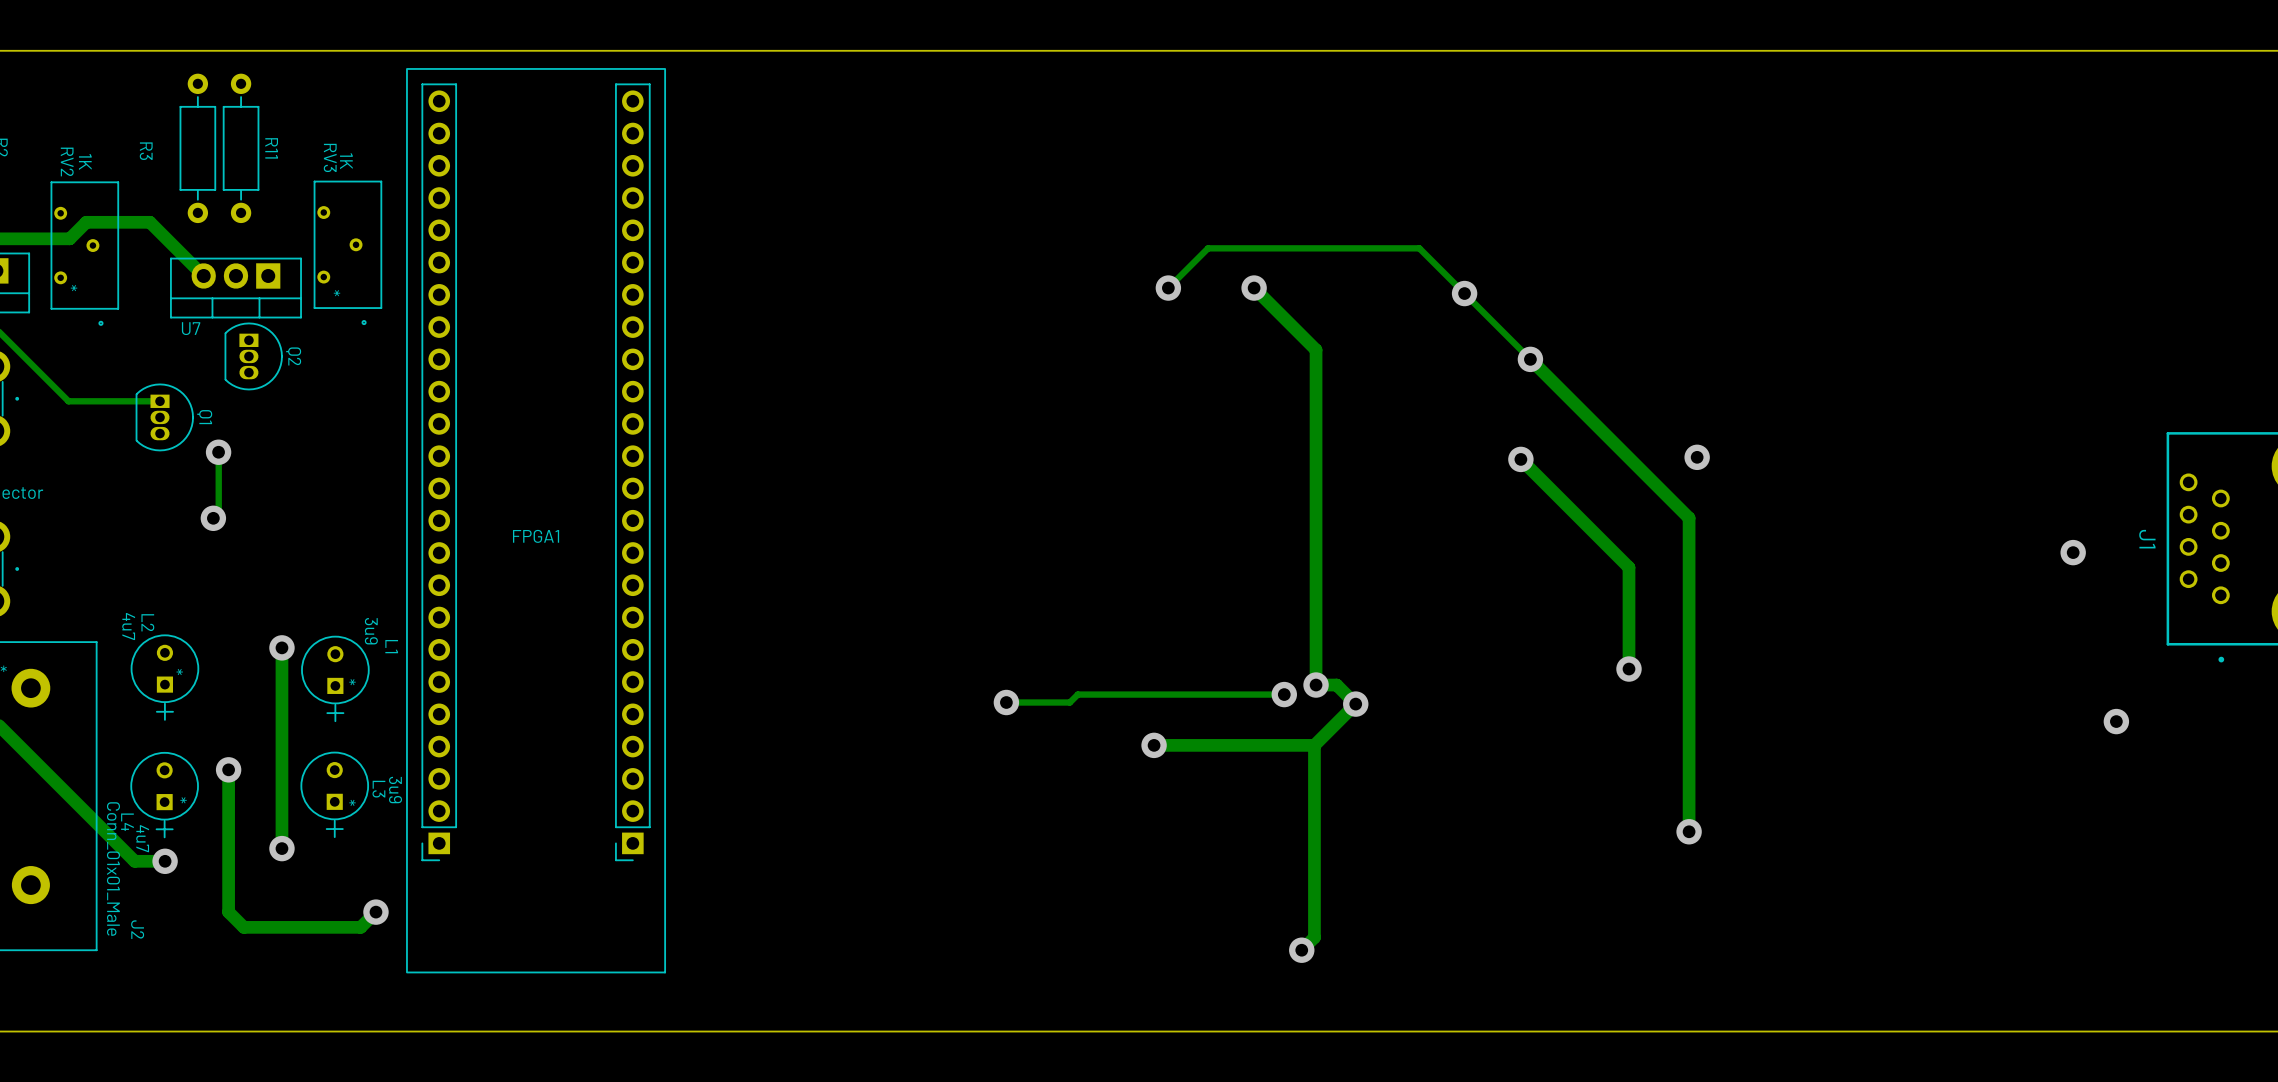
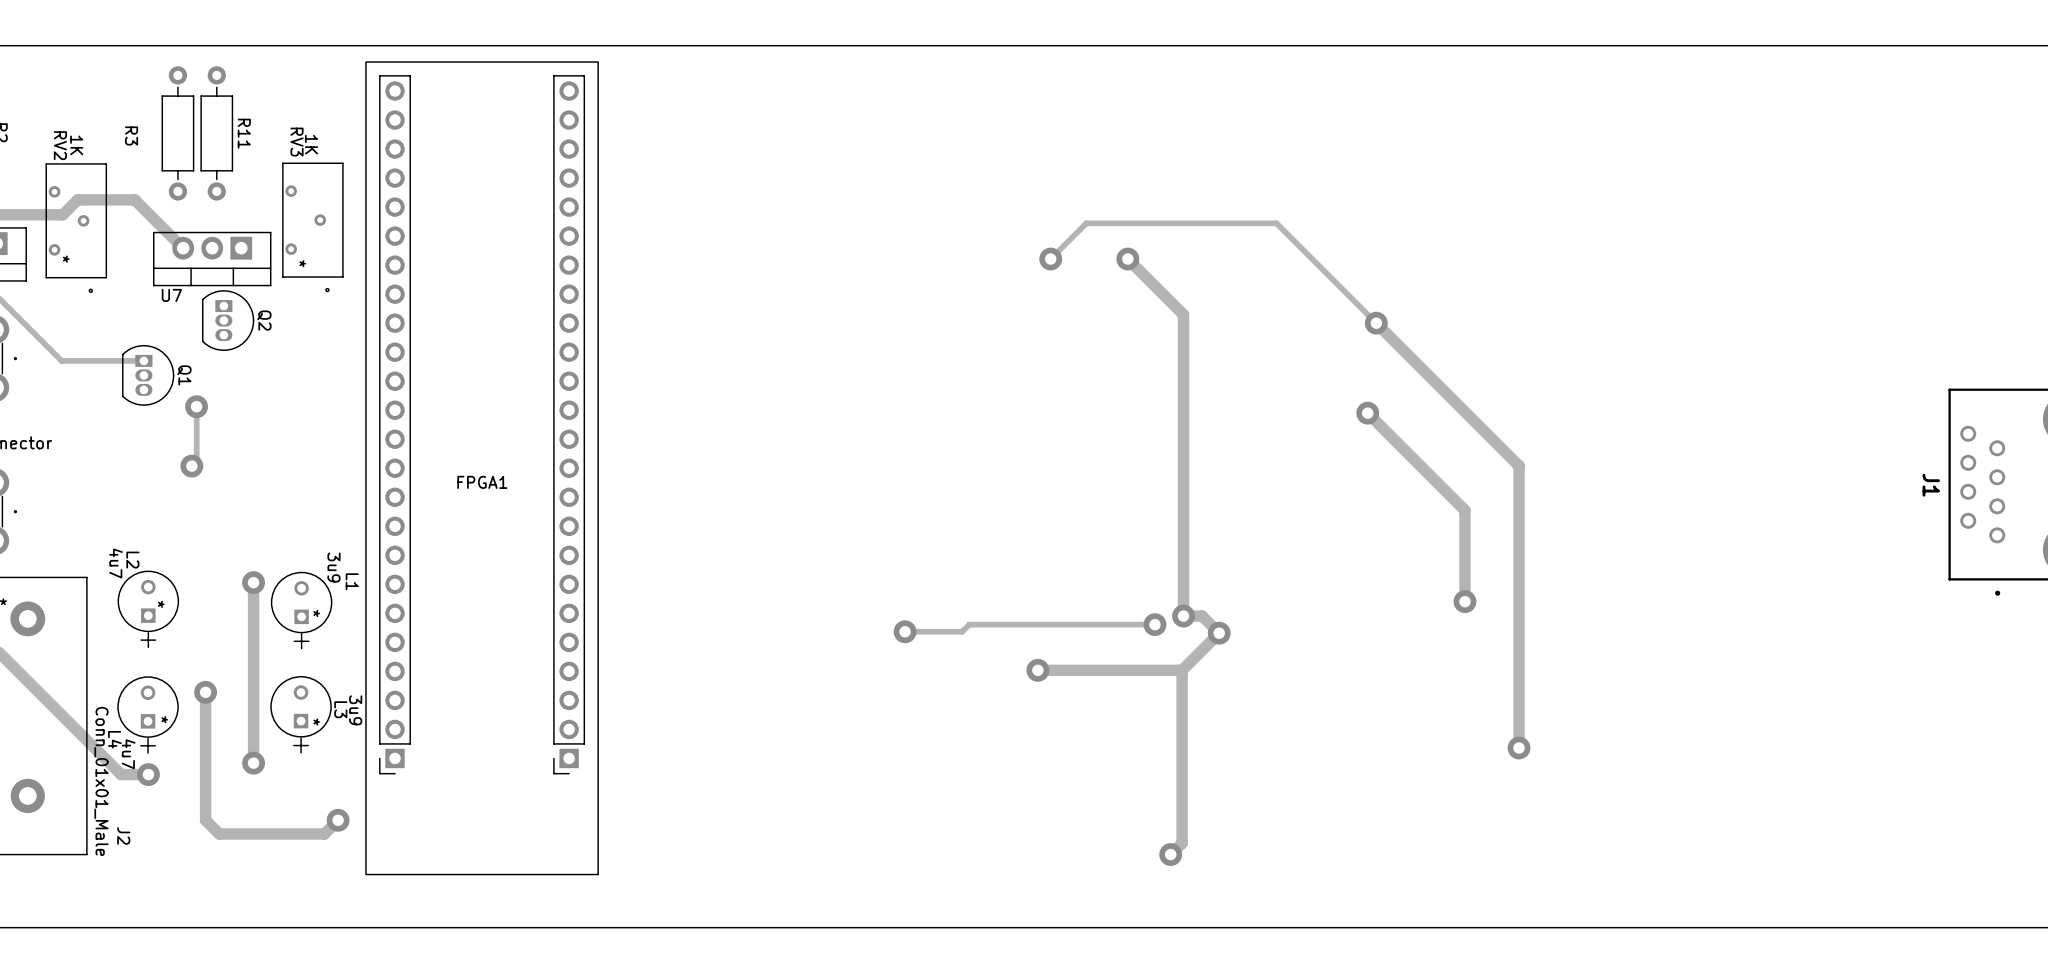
via: (1464, 293) -> none
via: (1697, 457) -> none
via: (2073, 552) -> none
via: (2116, 721) -> none

